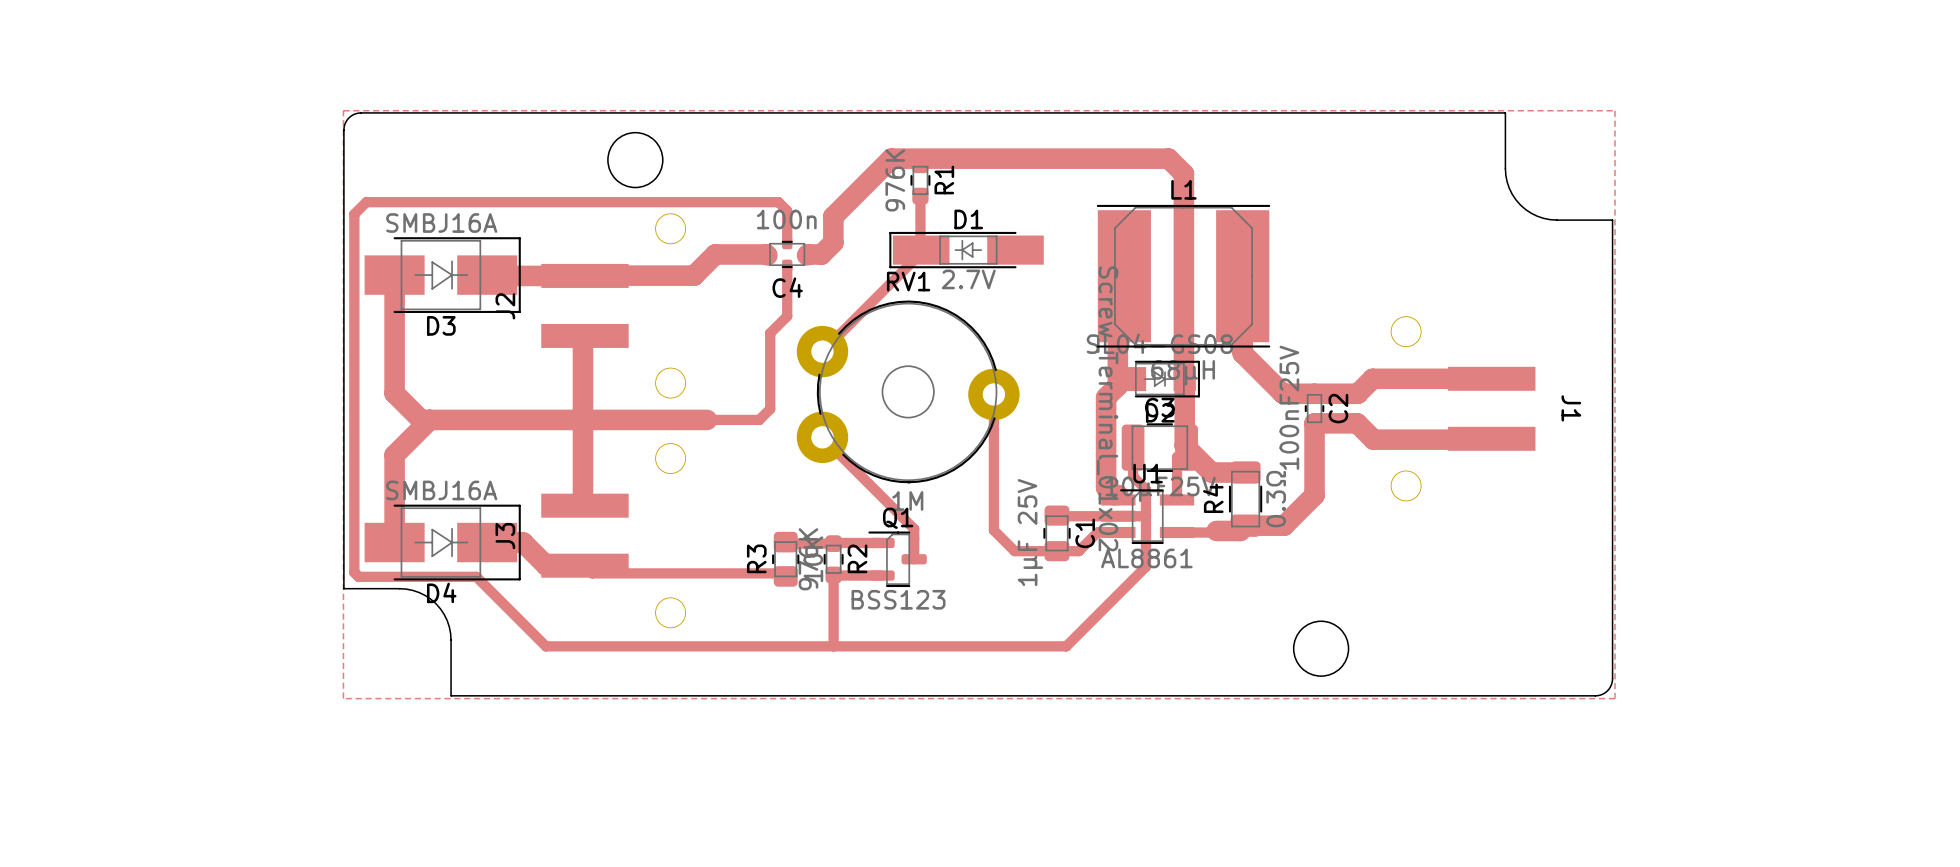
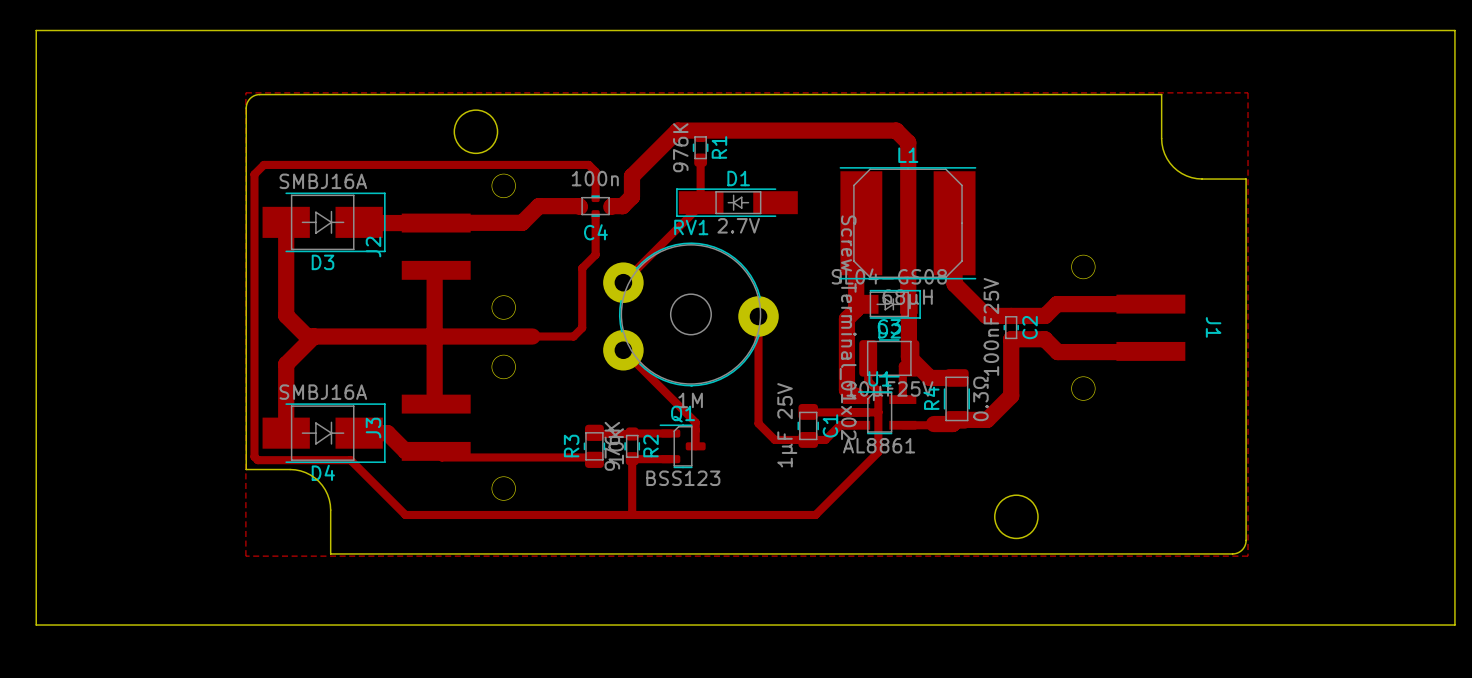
board edge: none -> (36, 30) (36, 625) (1454, 625) (1454, 30) (36, 30)

